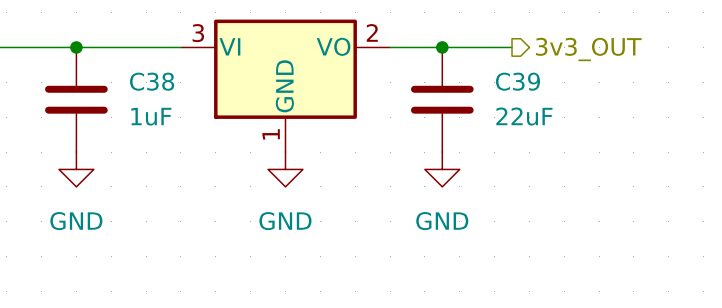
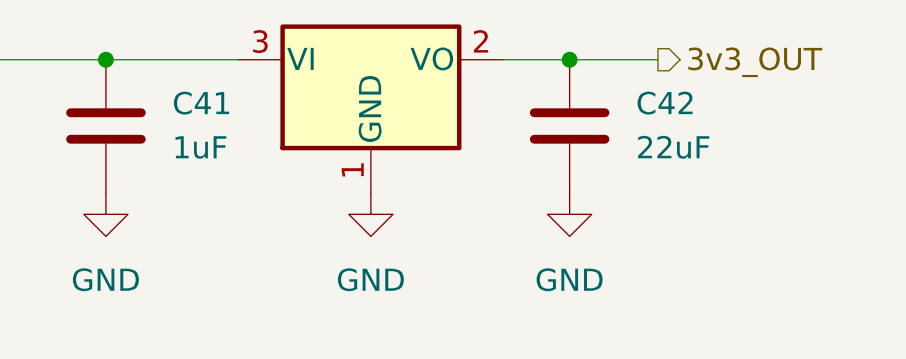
C38 name: C38 (152, 81) -> C41 (201, 103)
C39 name: C39 (517, 81) -> C42 (665, 103)

